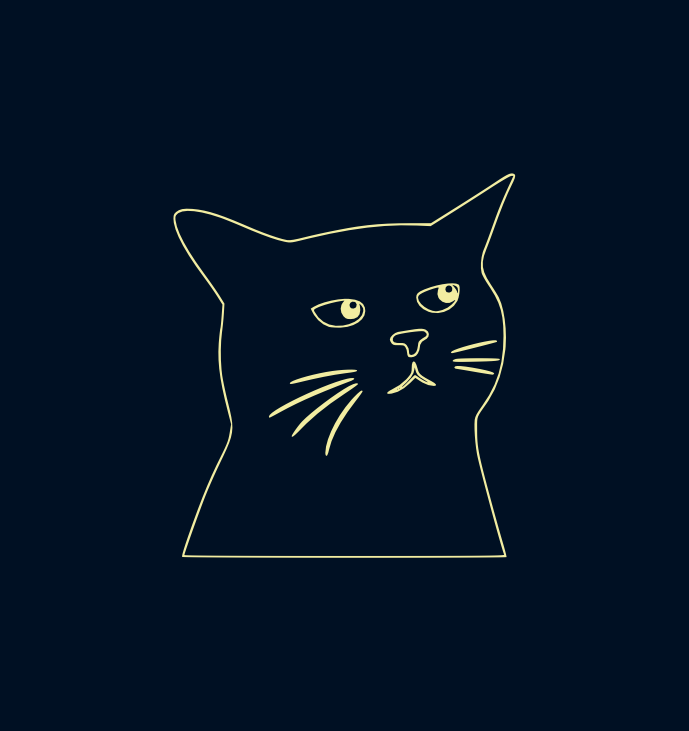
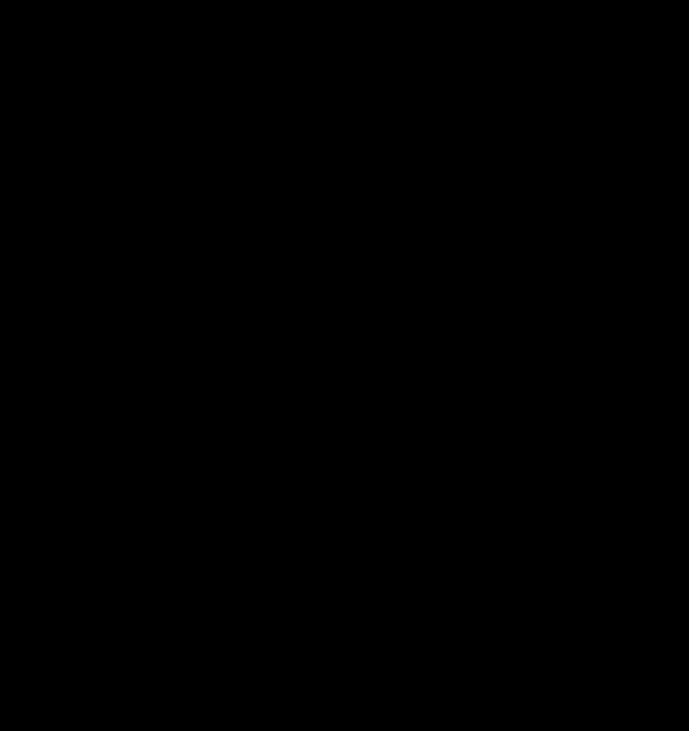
drawing: [173, 173, 516, 558] -> none

